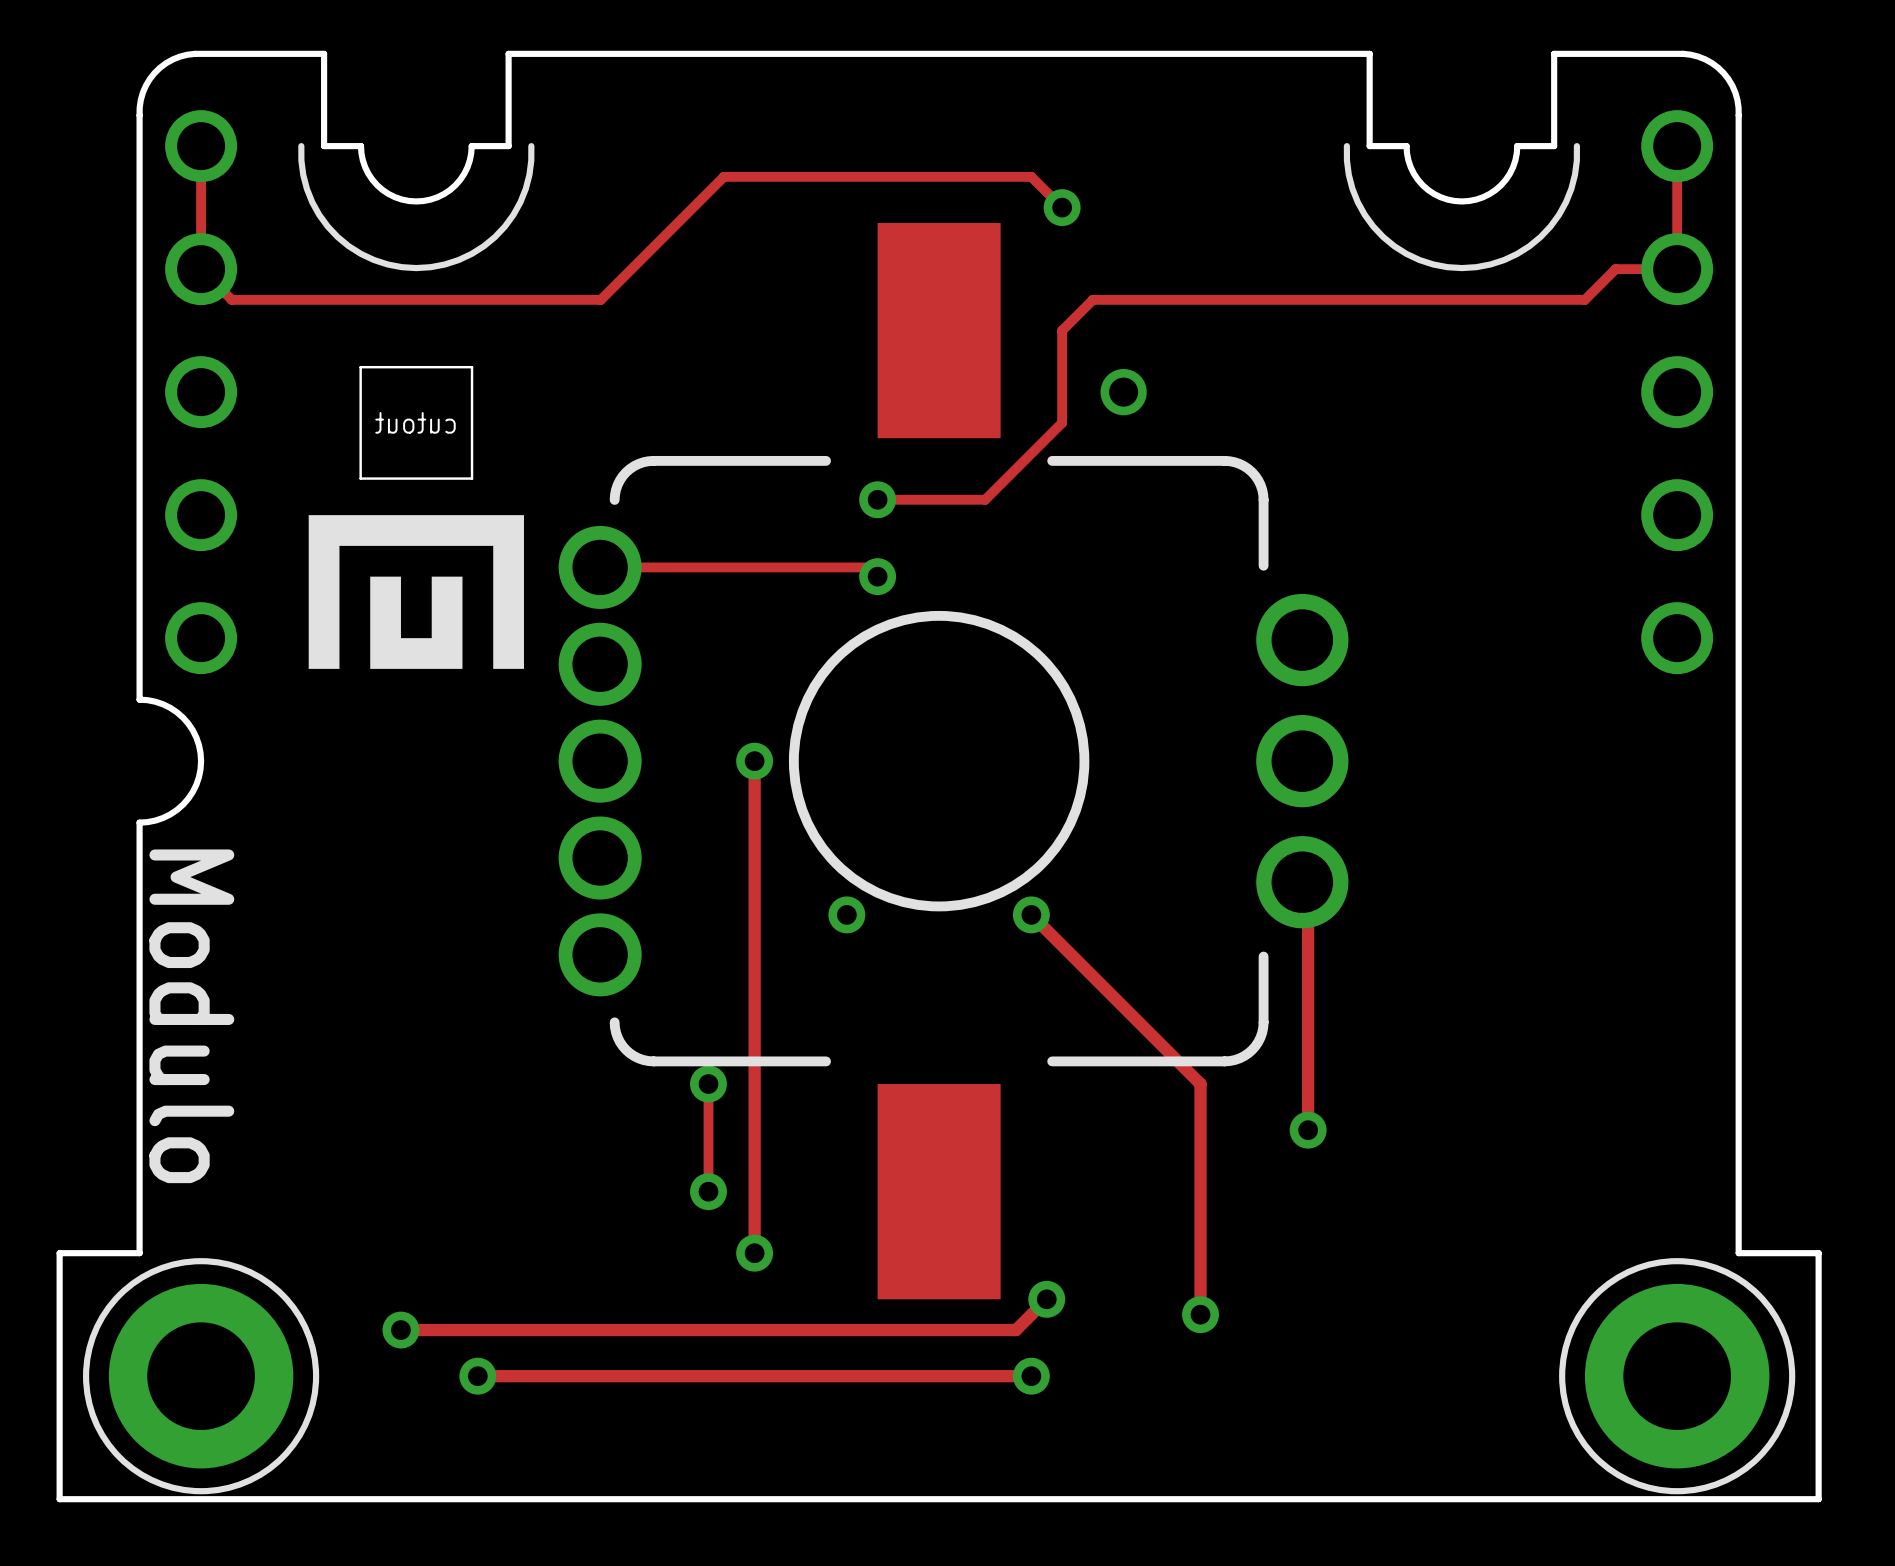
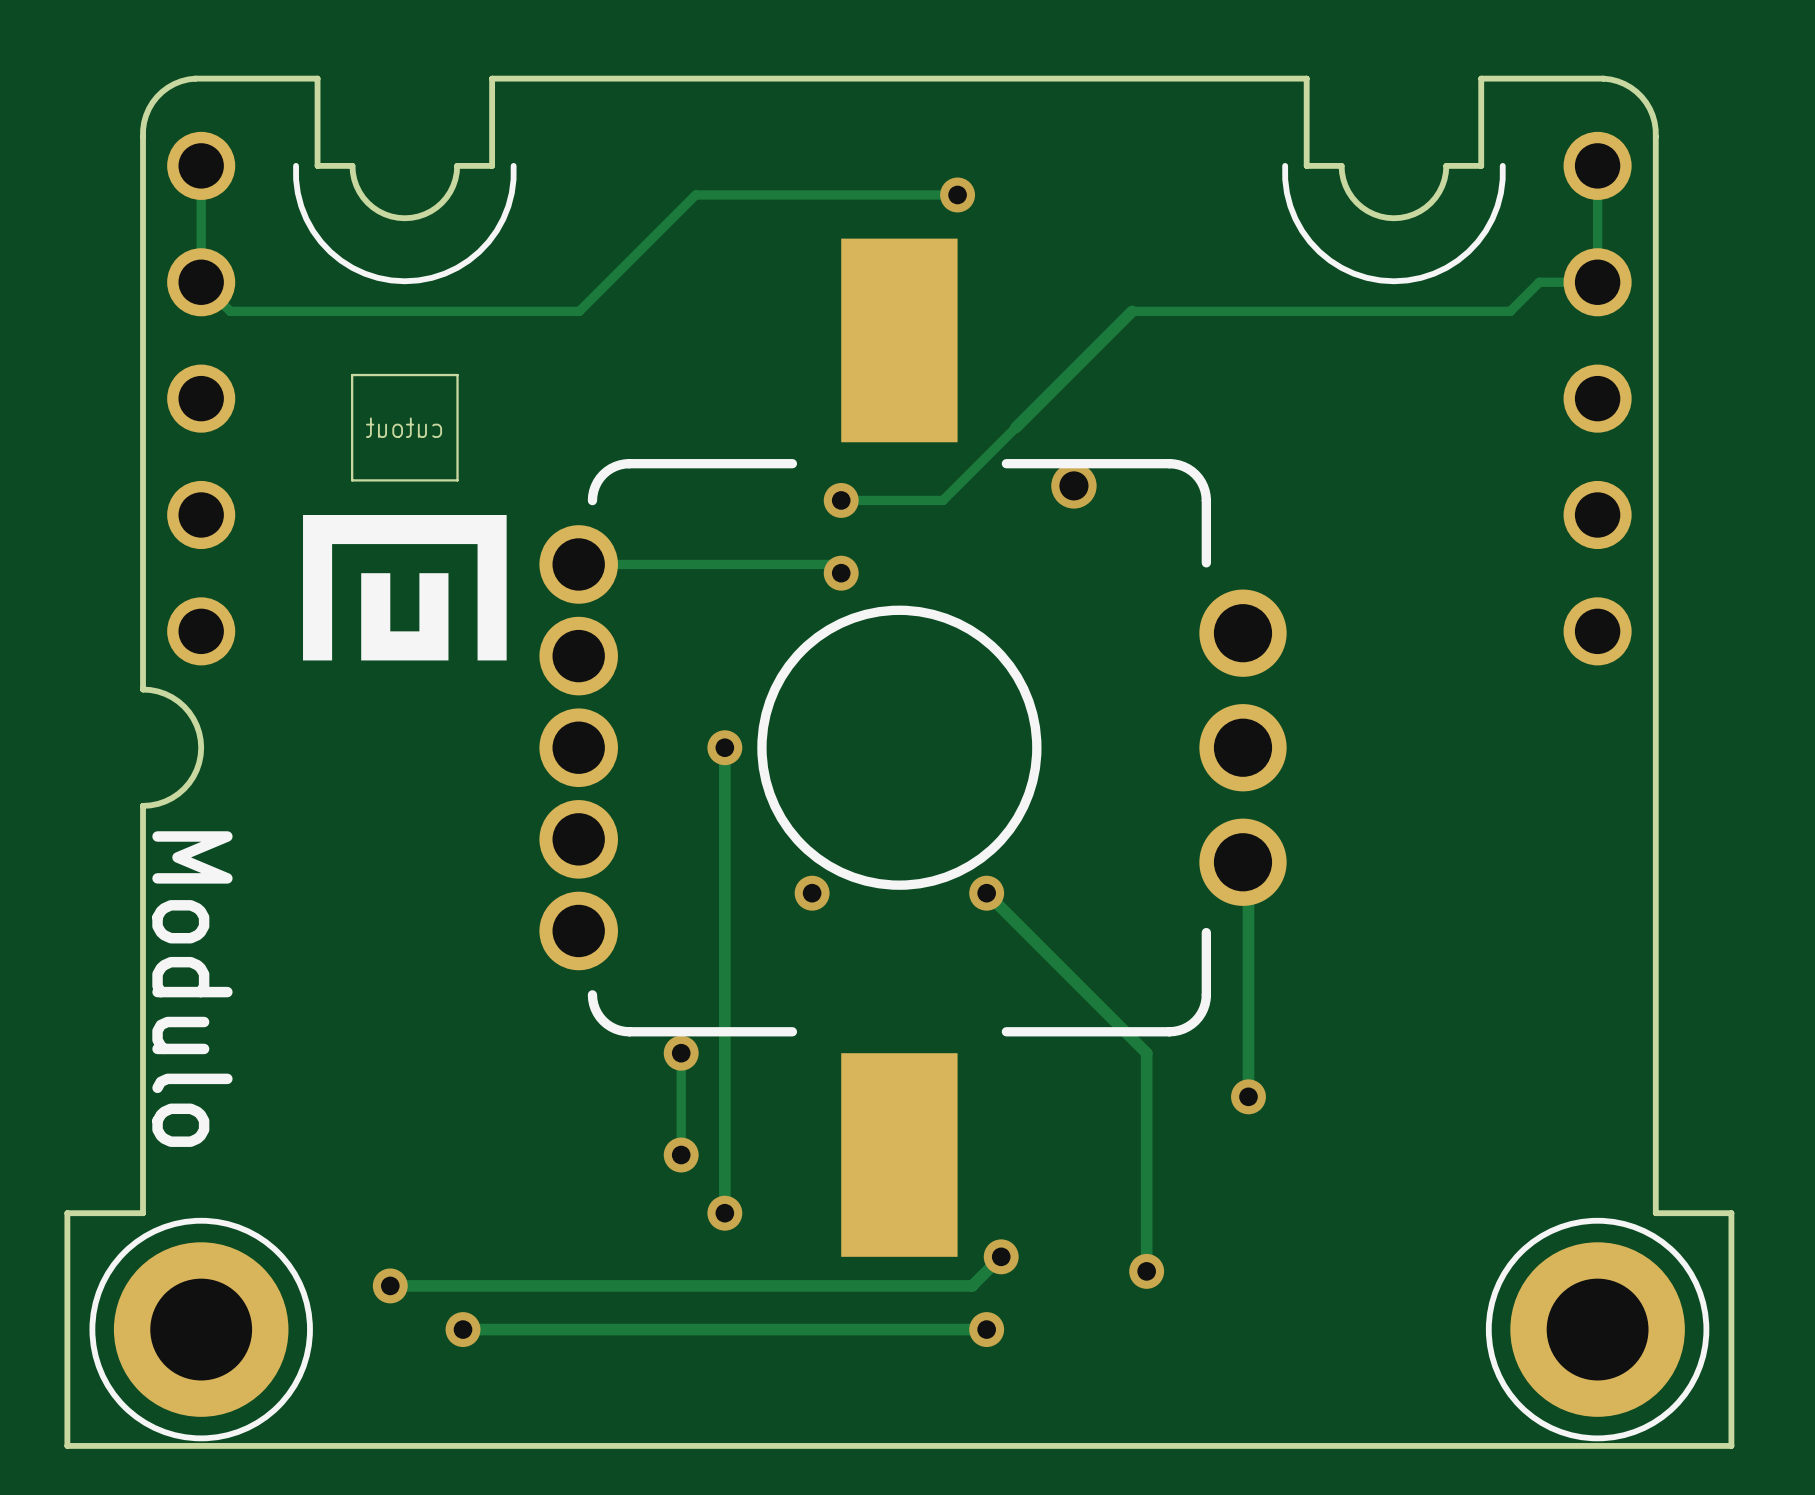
track: (1000, 176) (1031, 176) (1062, 207) -> none
via position: (1062, 207) -> (957, 194)
track: (1185, 299) (1092, 299) (1062, 330) (1062, 422) -> (1132, 311) (1015, 427)
via: (1123, 392) -> none
via: none -> (1073, 485)

